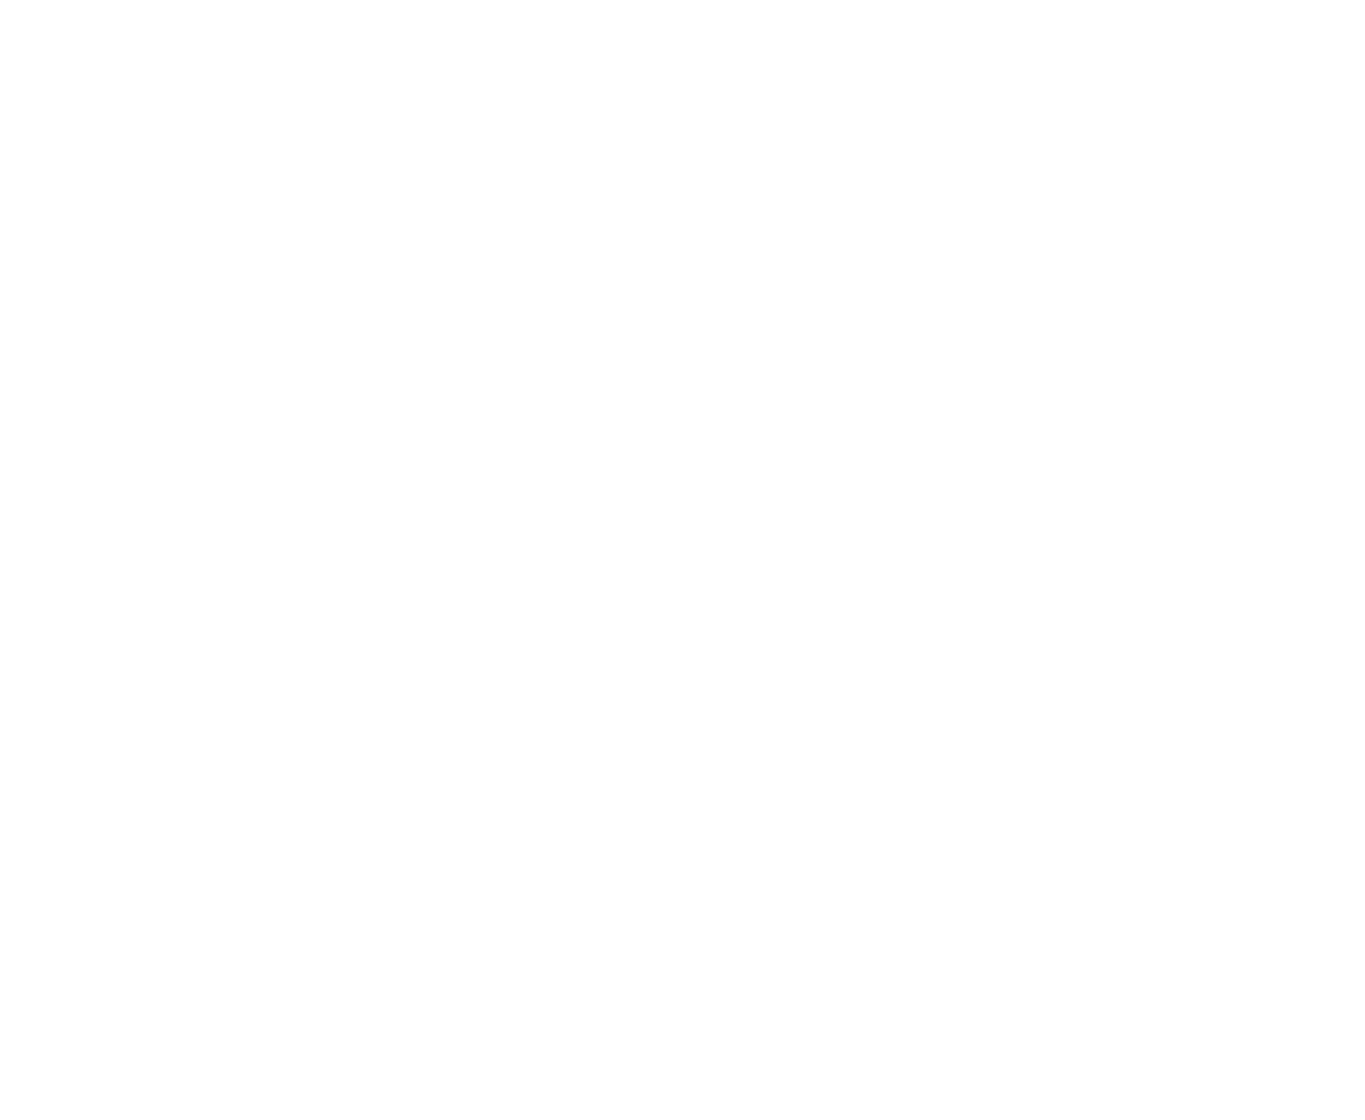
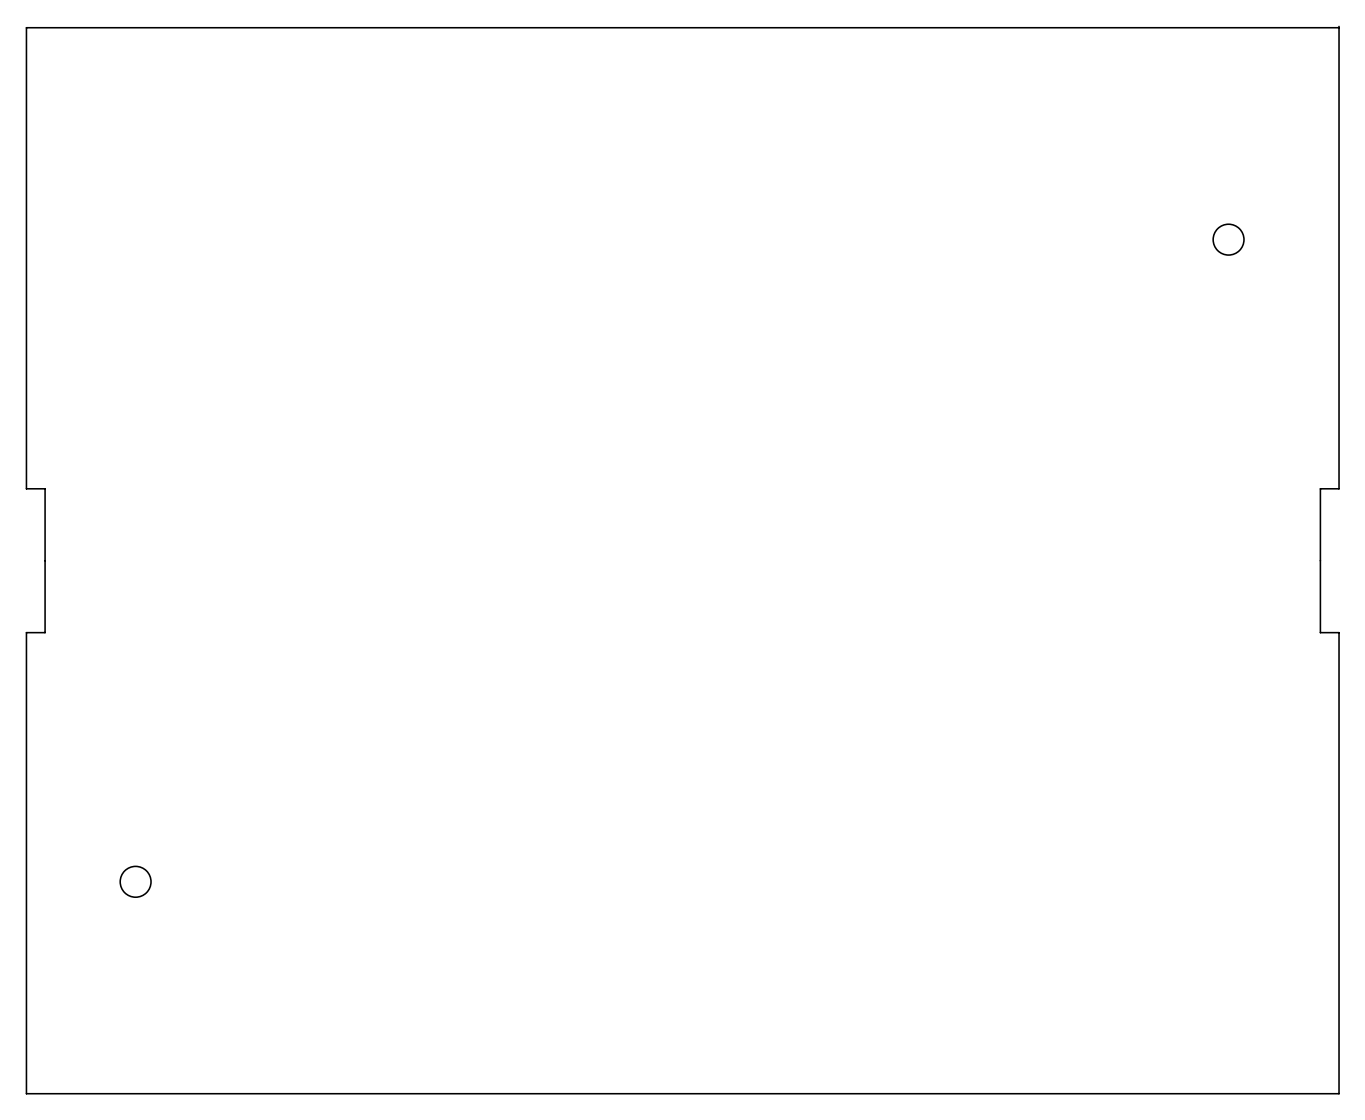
board edge: none -> (1339, 26) (1339, 488) (1320, 488) (1320, 632) (1339, 632) (1339, 1093) (26, 1093) (26, 632) (45, 632) (45, 488) (26, 488) (26, 27) (1339, 27)
round board edge: none -> [1212, 223, 1245, 256]
round board edge: none -> [119, 866, 152, 898]

